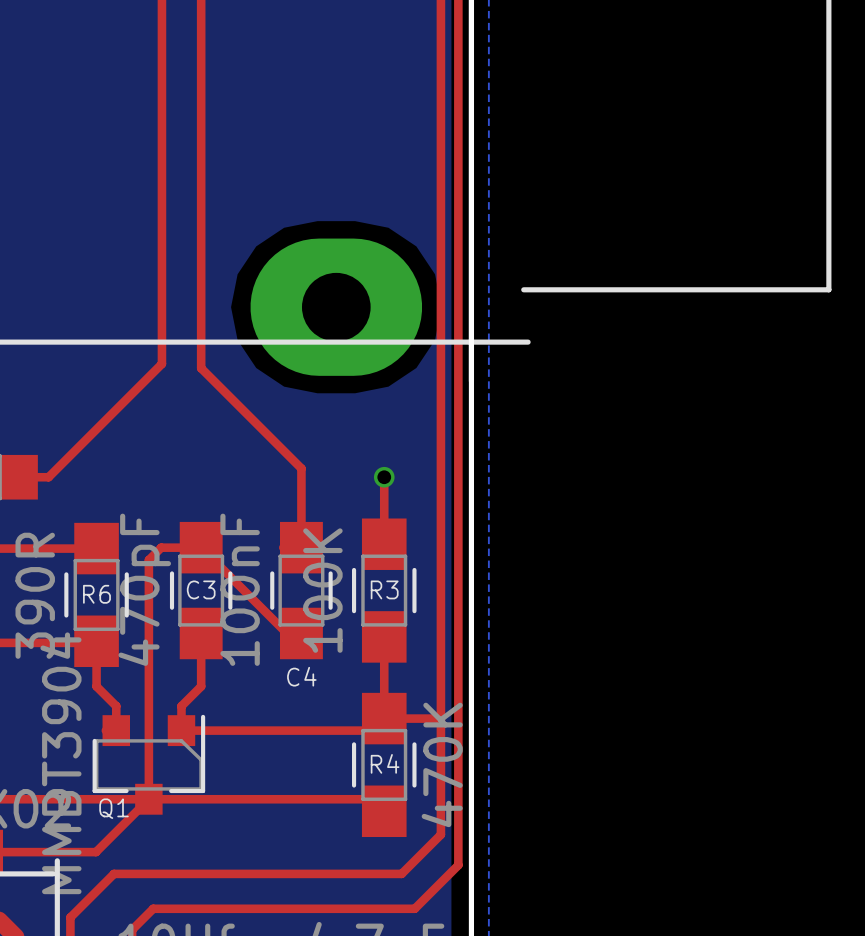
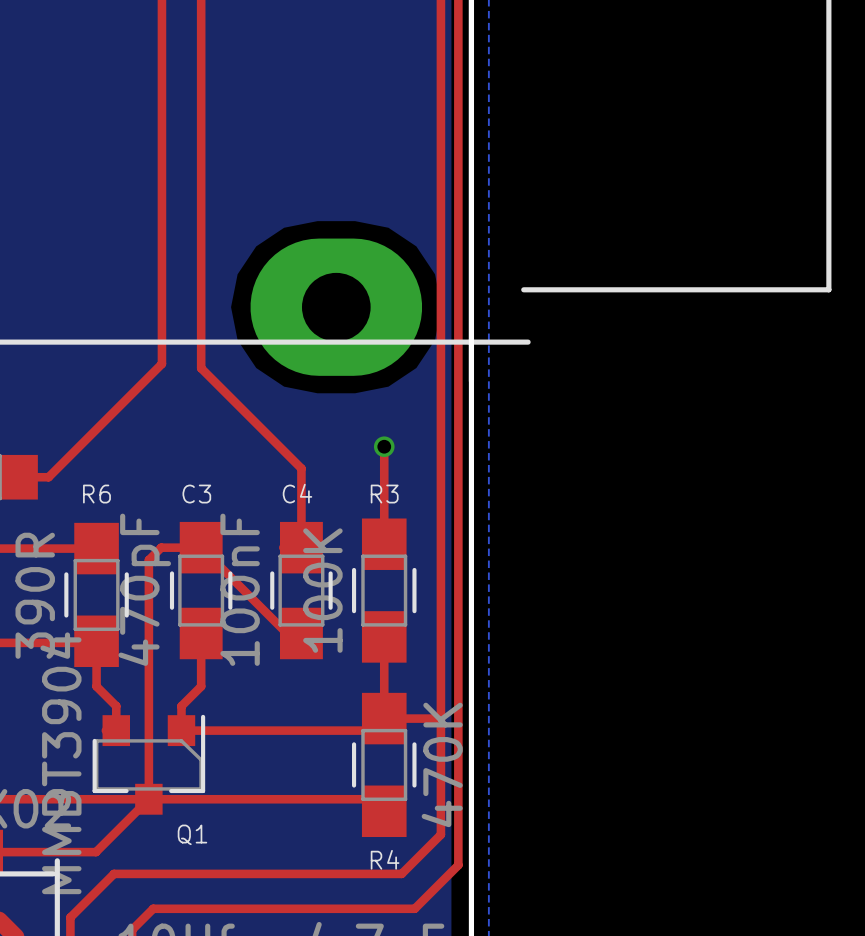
top track: none -> (384, 446) (384, 477)
via position: (384, 477) -> (384, 446)
C3 name position: C3 (201, 589) -> C3 (196, 494)
R3 name position: R3 (384, 589) -> R3 (384, 494)
R6 name position: R6 (96, 594) -> R6 (96, 494)
C4 name position: C4 (301, 676) -> C4 (297, 493)
R4 name position: R4 (385, 763) -> R4 (385, 859)
Q1 name position: Q1 (114, 808) -> Q1 (192, 834)

